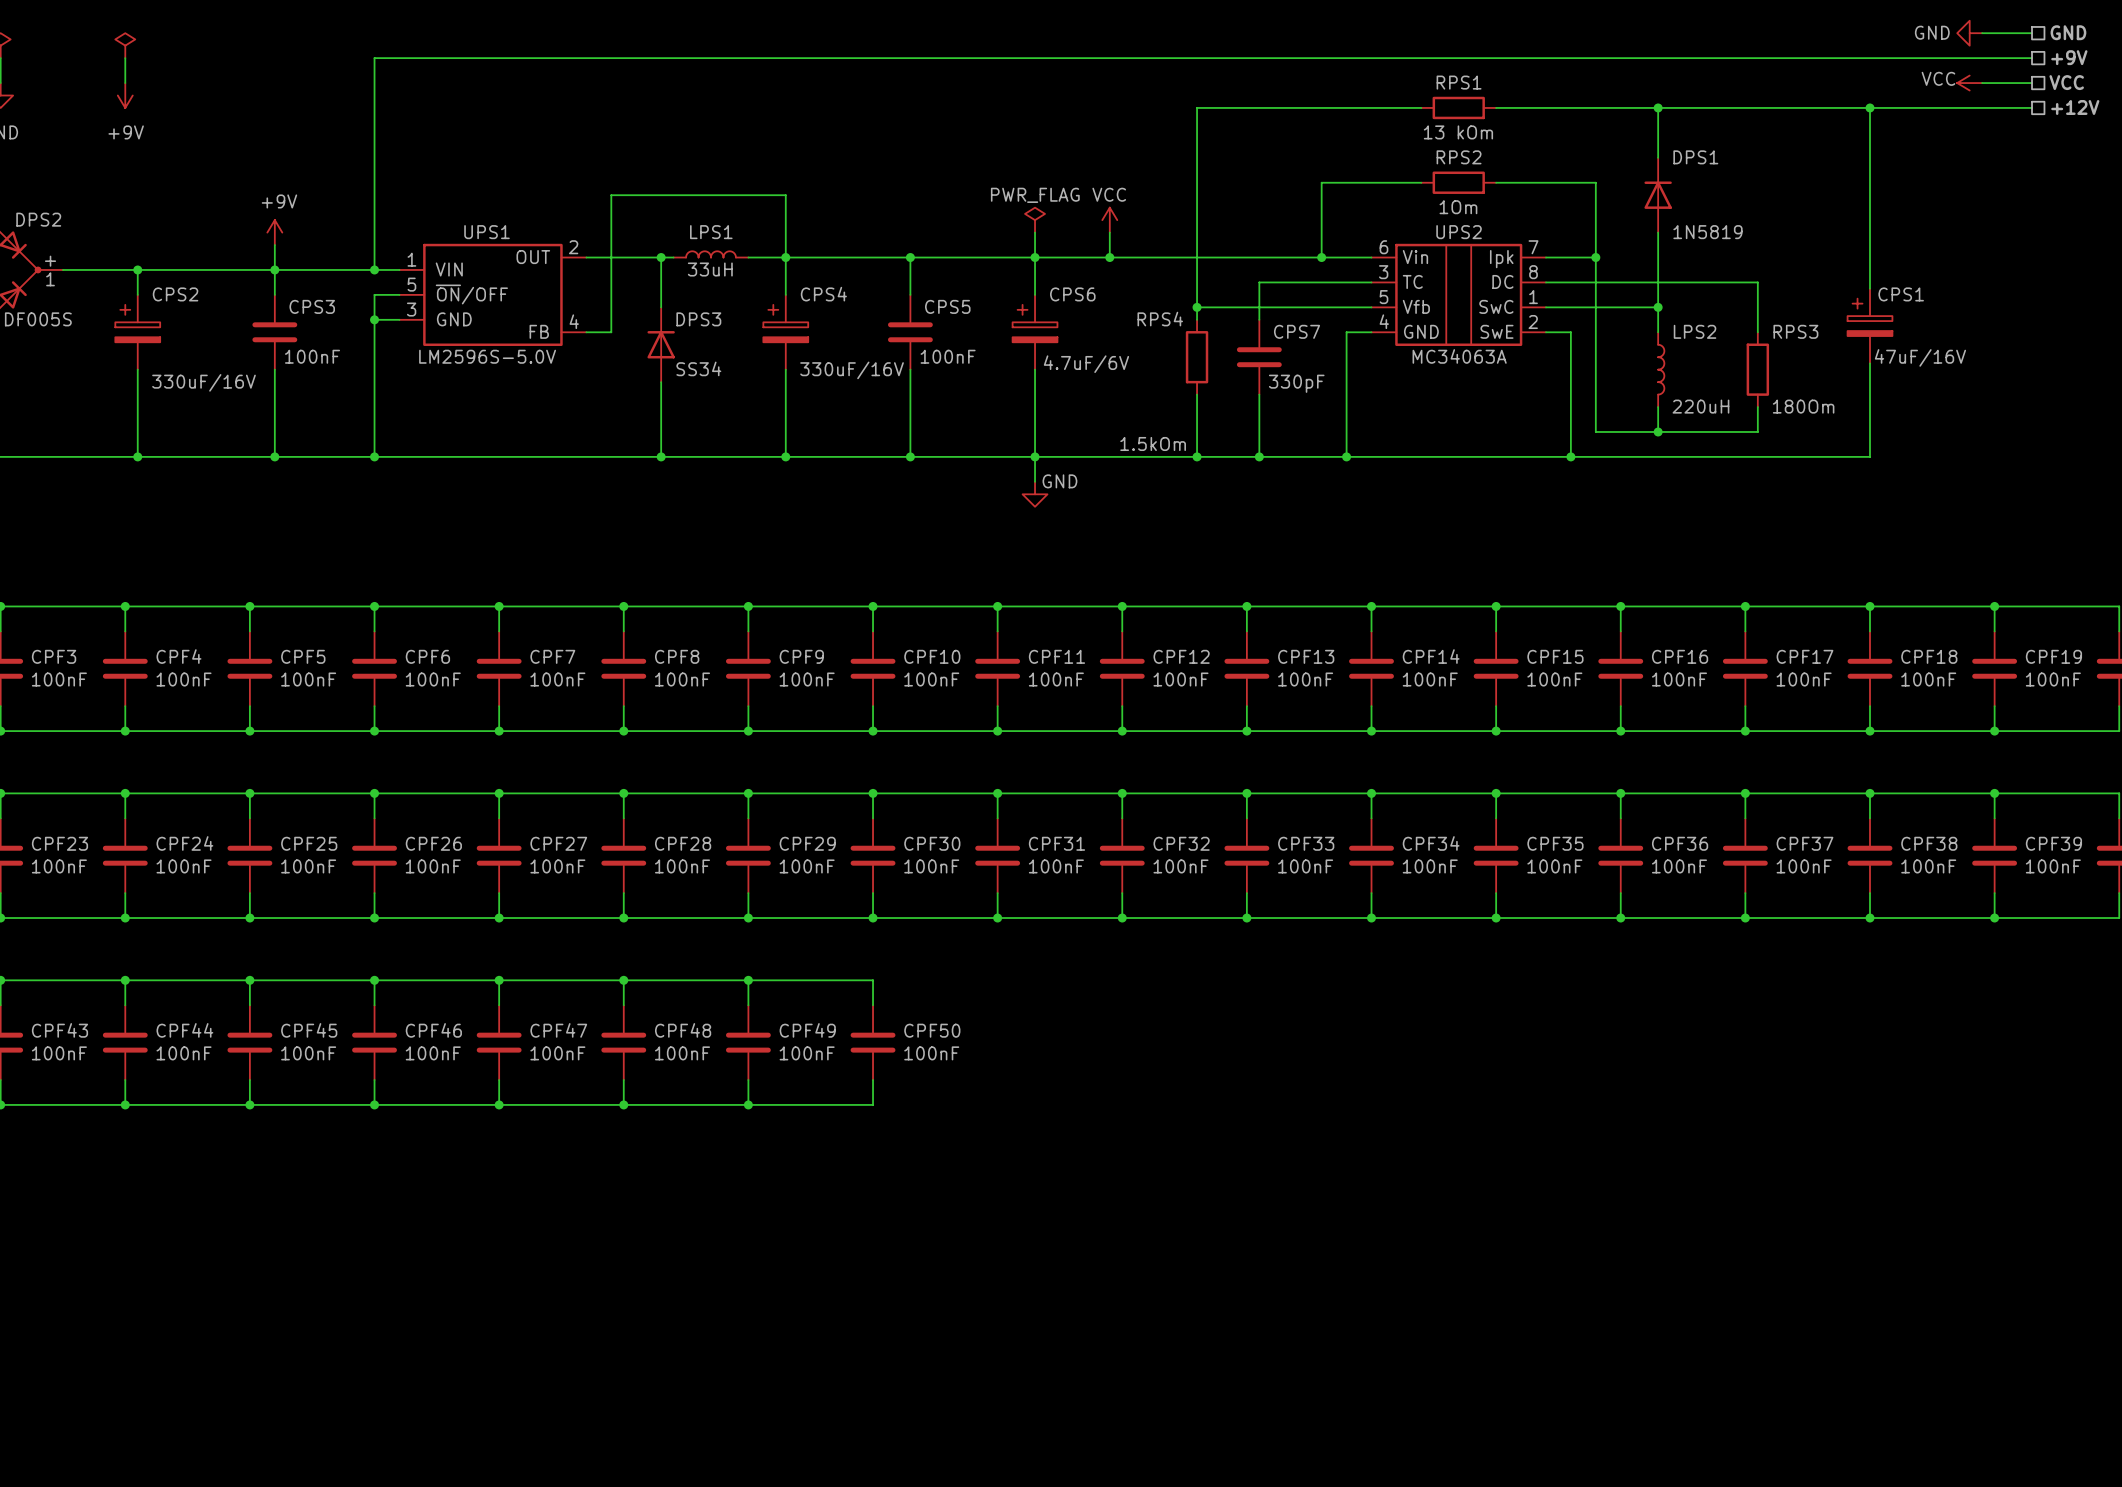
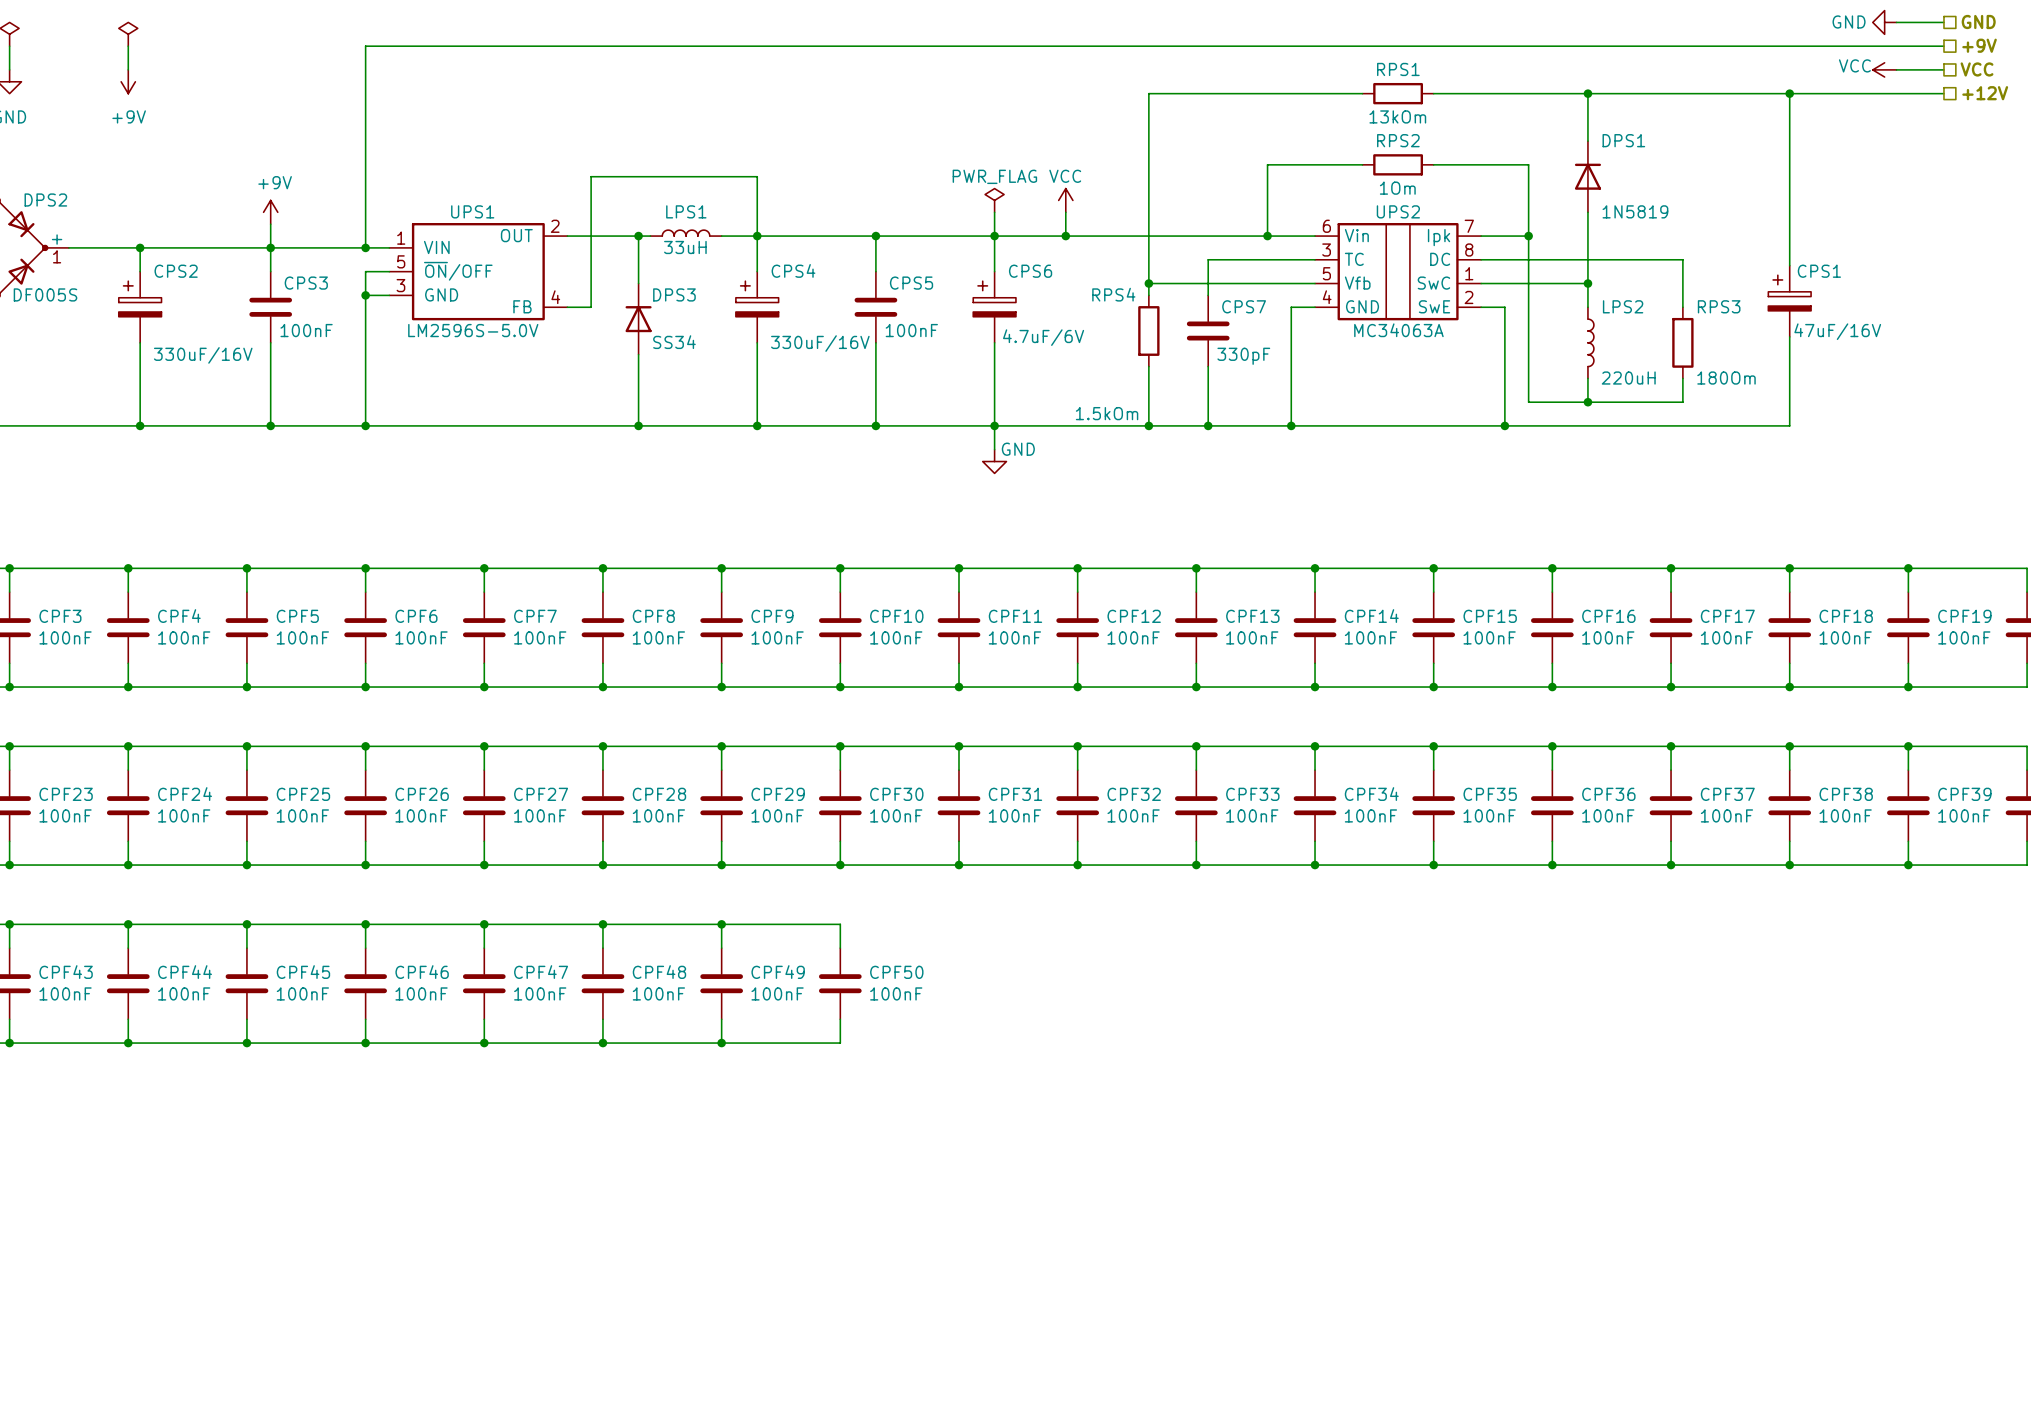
RPS1 value: 13 kOm (1458, 132) -> 13kOm (1397, 116)

